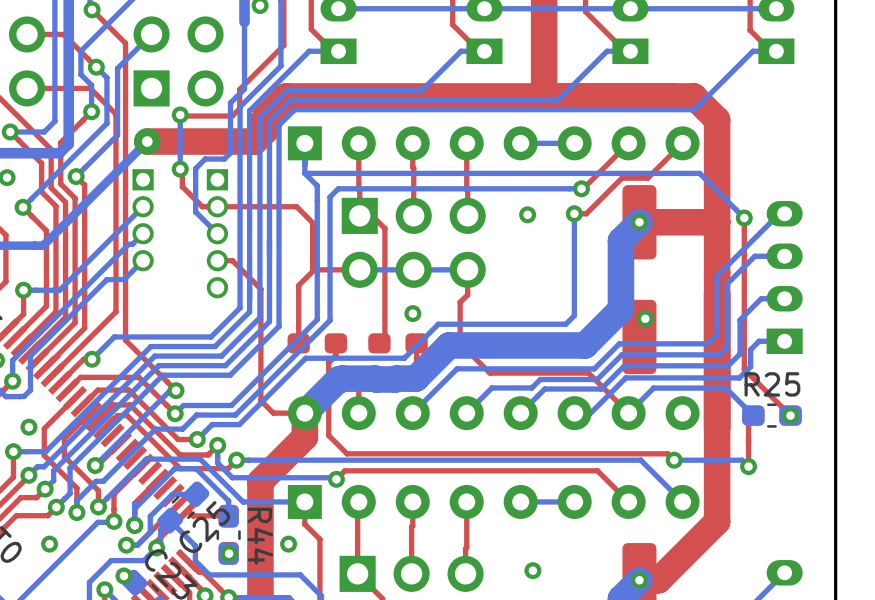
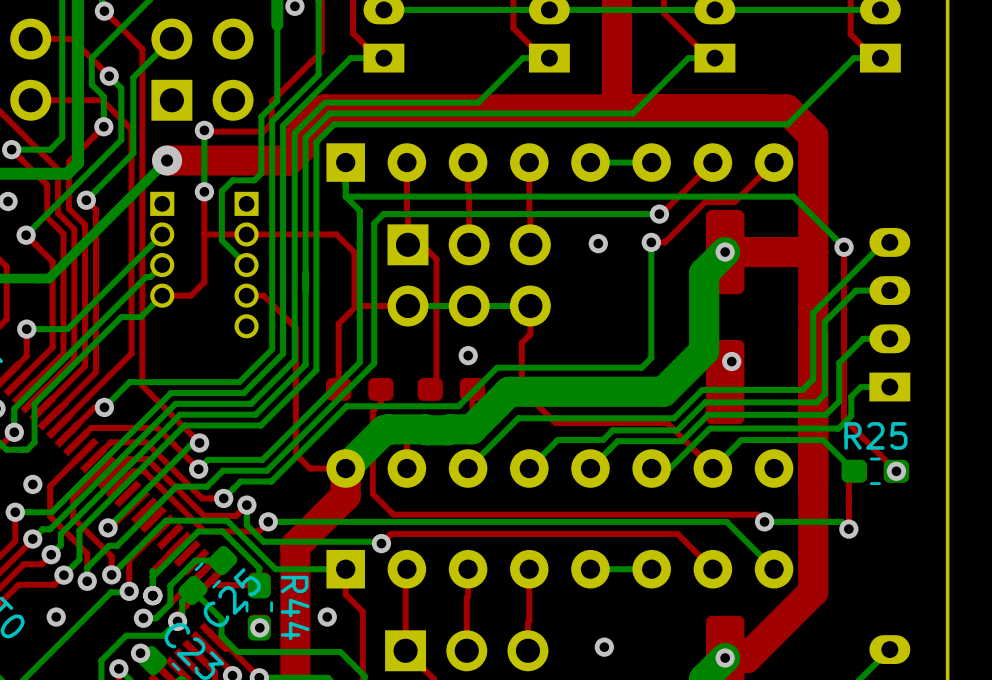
top track: (180, 169) (182, 171) (182, 186) (202, 206) -> (204, 233) (229, 234)
top track: none -> (204, 191) (204, 282) (190, 295) (162, 295)

